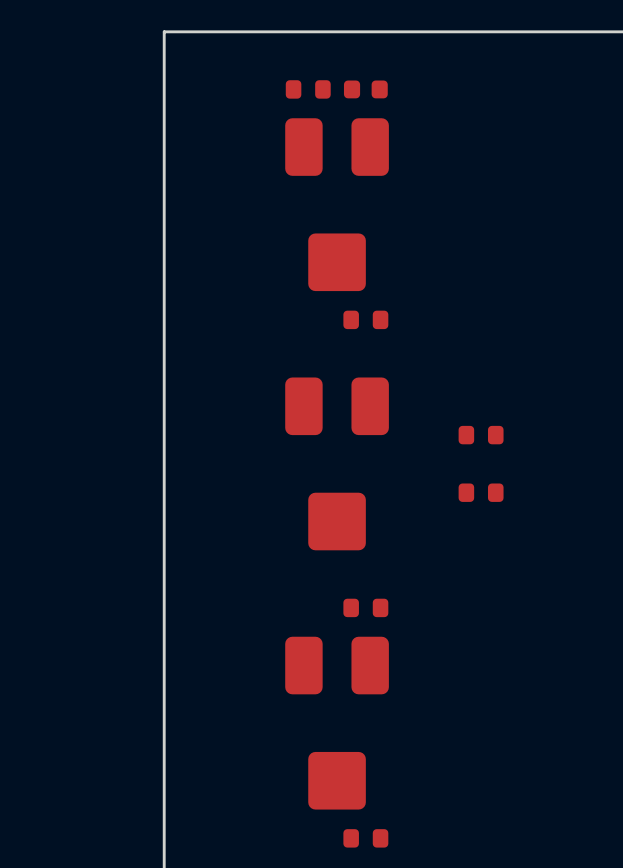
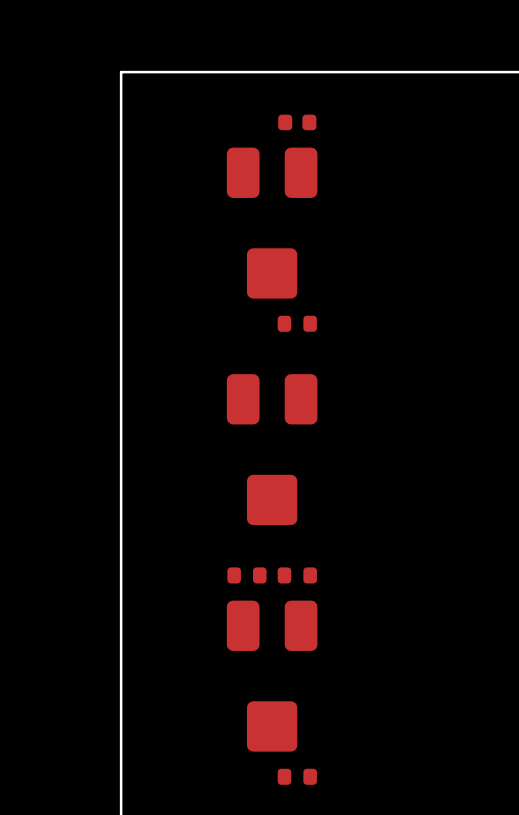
part: (308, 89) -> none
part: (481, 435) -> none
part: (481, 492) -> none
part: none -> (246, 575)

